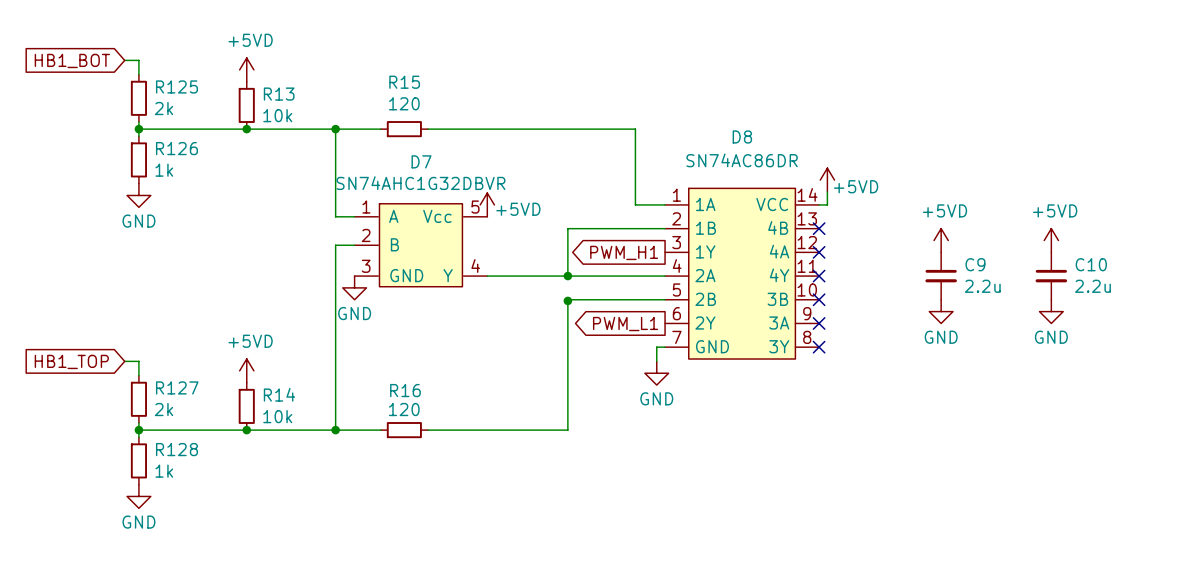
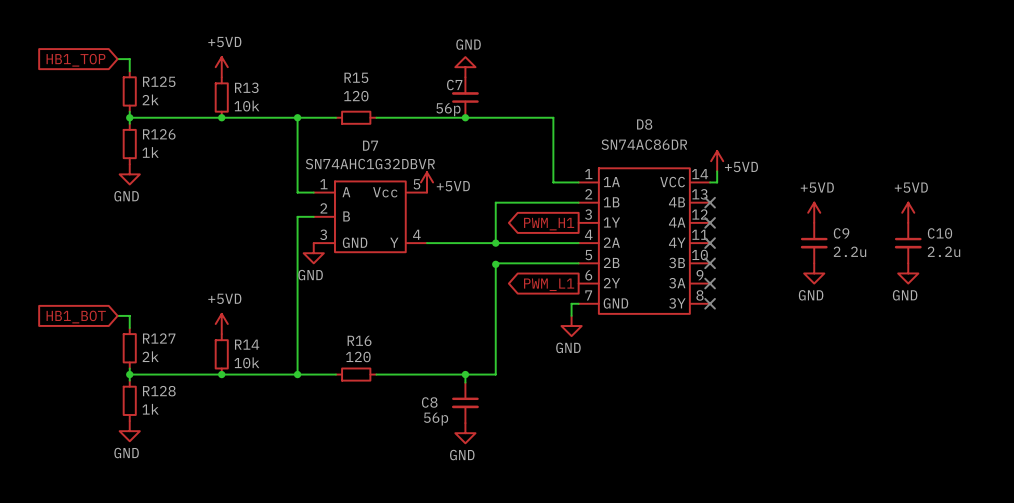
global label: HB1_BOT (72, 60) -> HB1_TOP (75, 60)
power symbol: none -> GND (465, 67)
C7: none -> 56p (465, 97)
junction: none -> (465, 117)
global label: HB1_TOP (71, 361) -> HB1_BOT (76, 317)
wire: none -> (465, 374) (465, 382)
junction: none -> (465, 374)
C8: none -> 56p (465, 402)
power symbol: none -> GND (465, 433)

